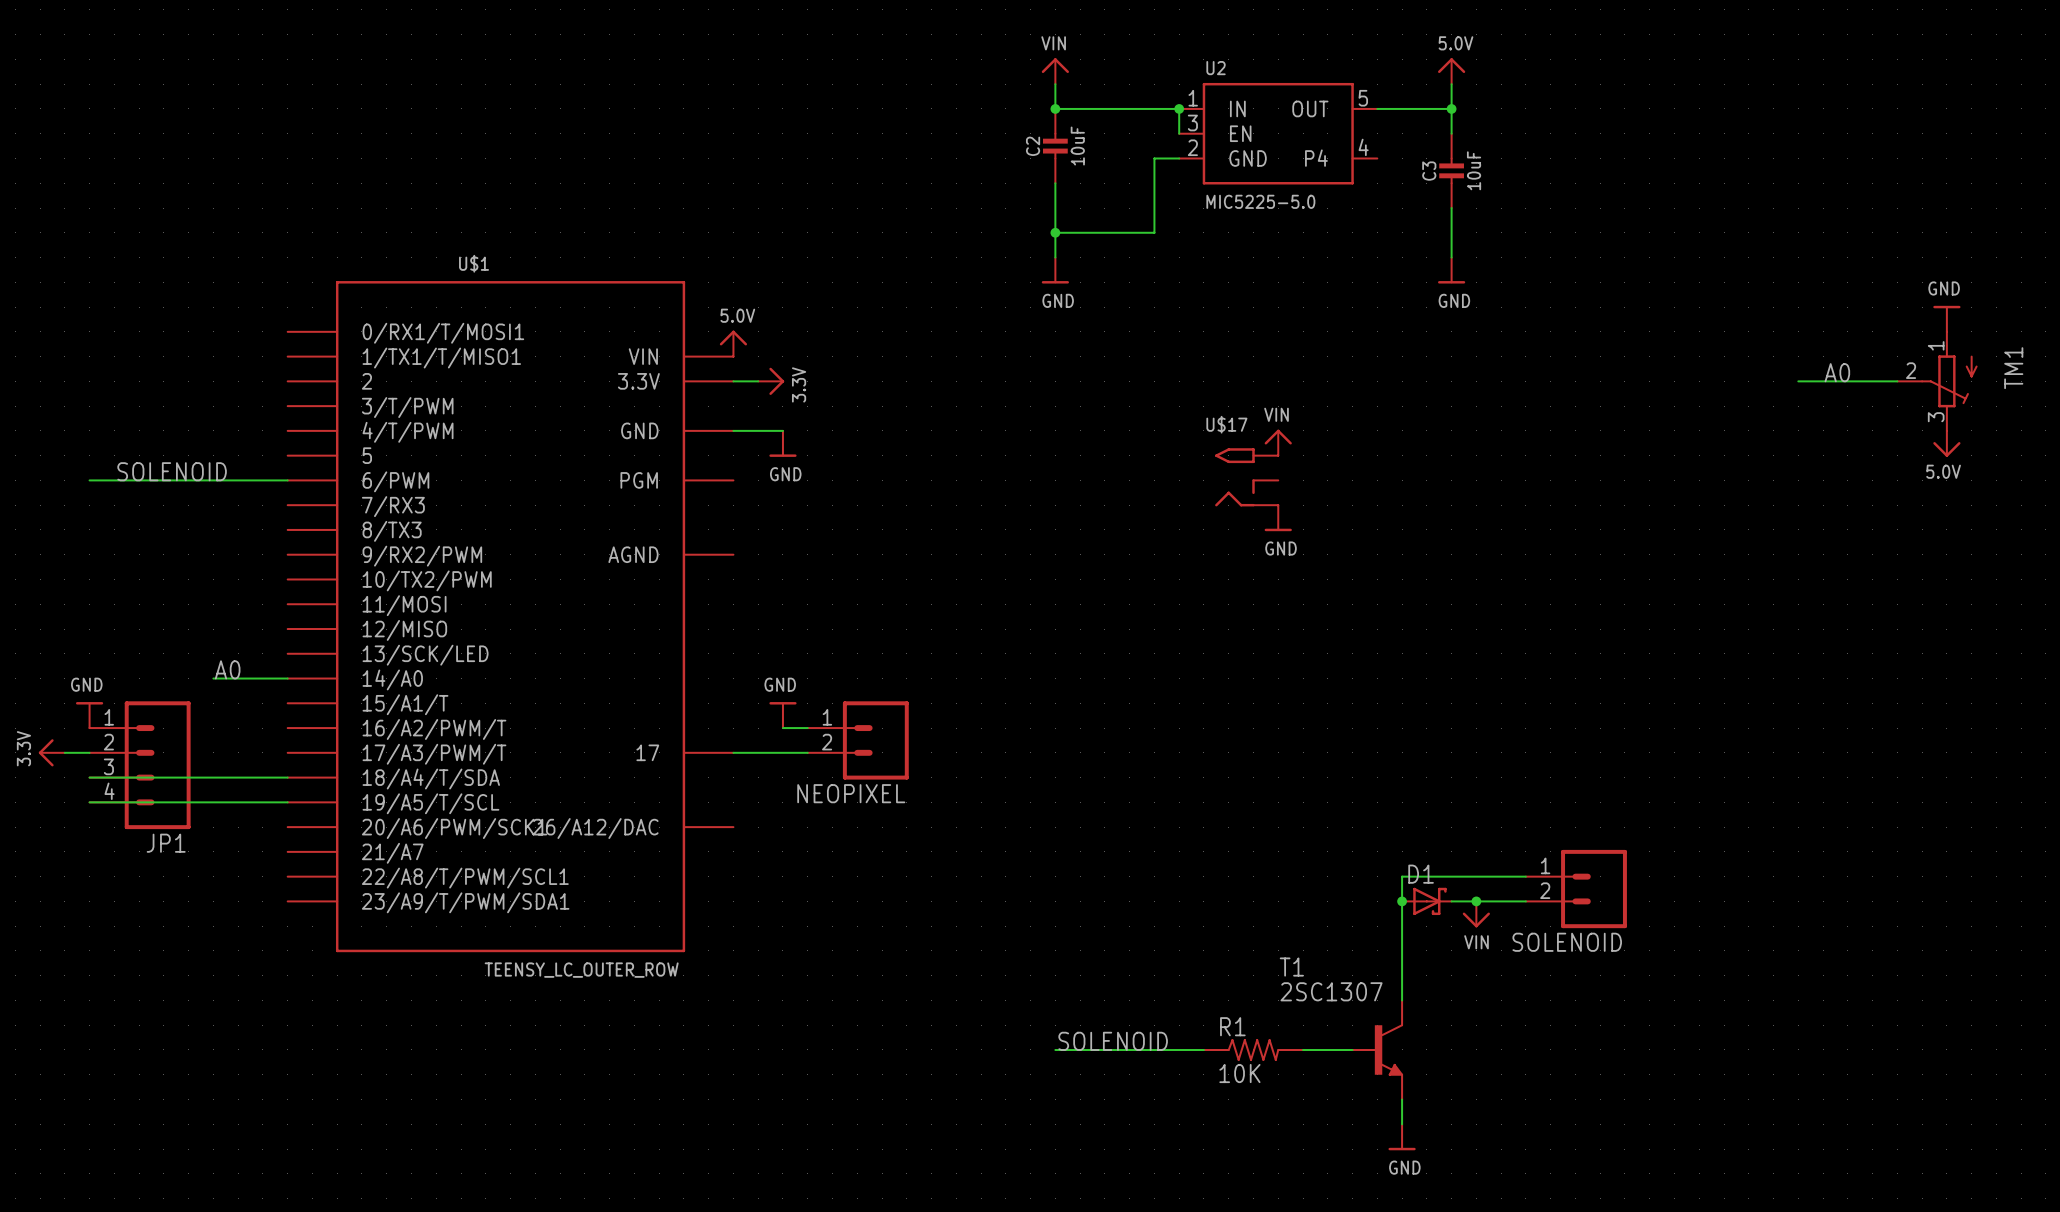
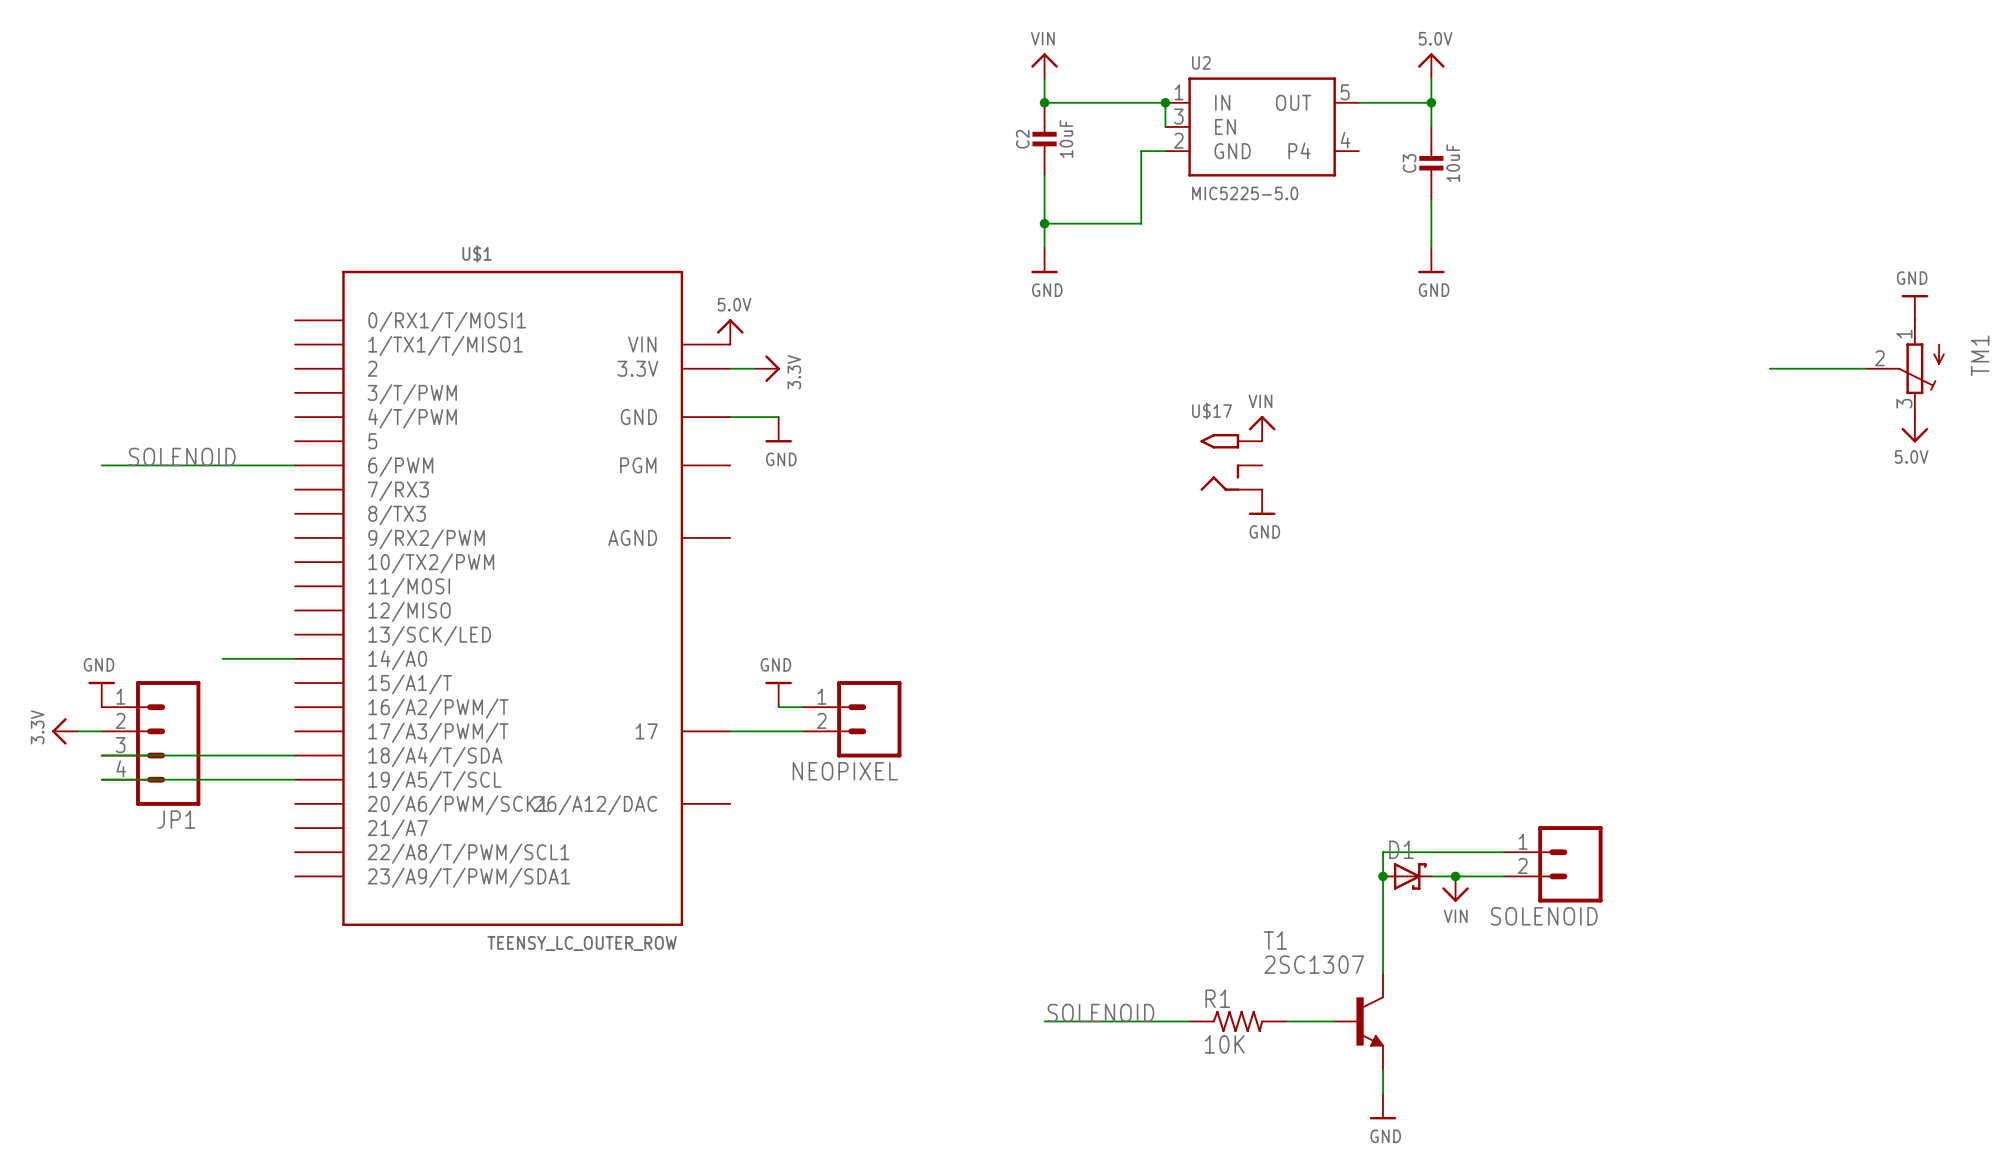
label: A0 (1837, 372) -> none
label: A0 (227, 669) -> none

